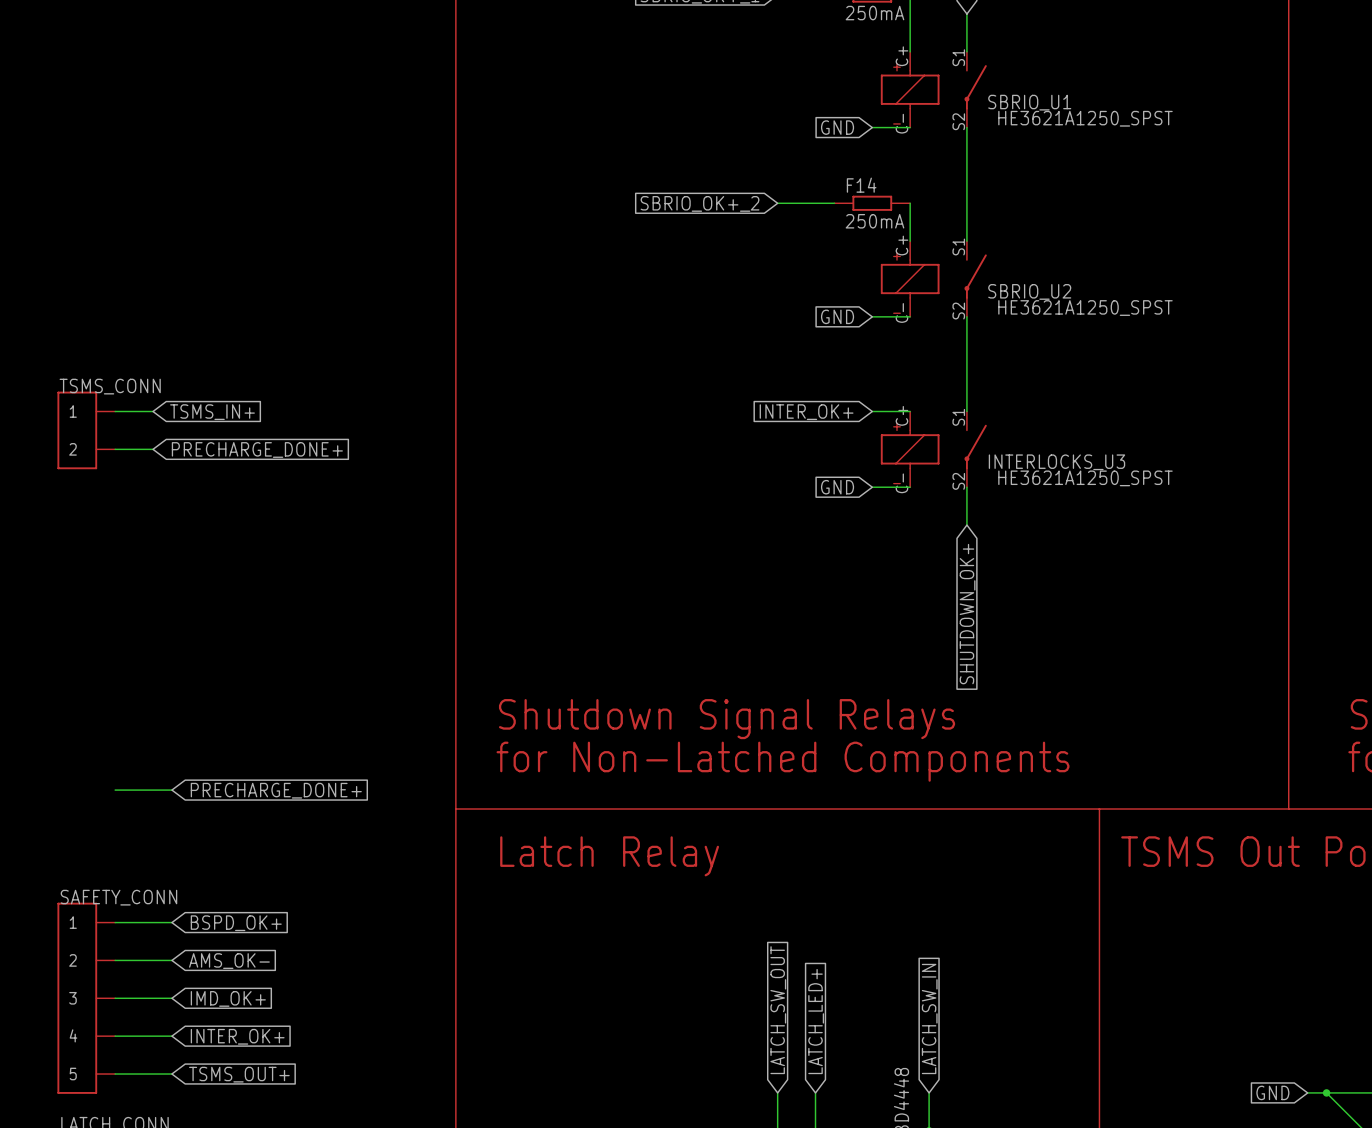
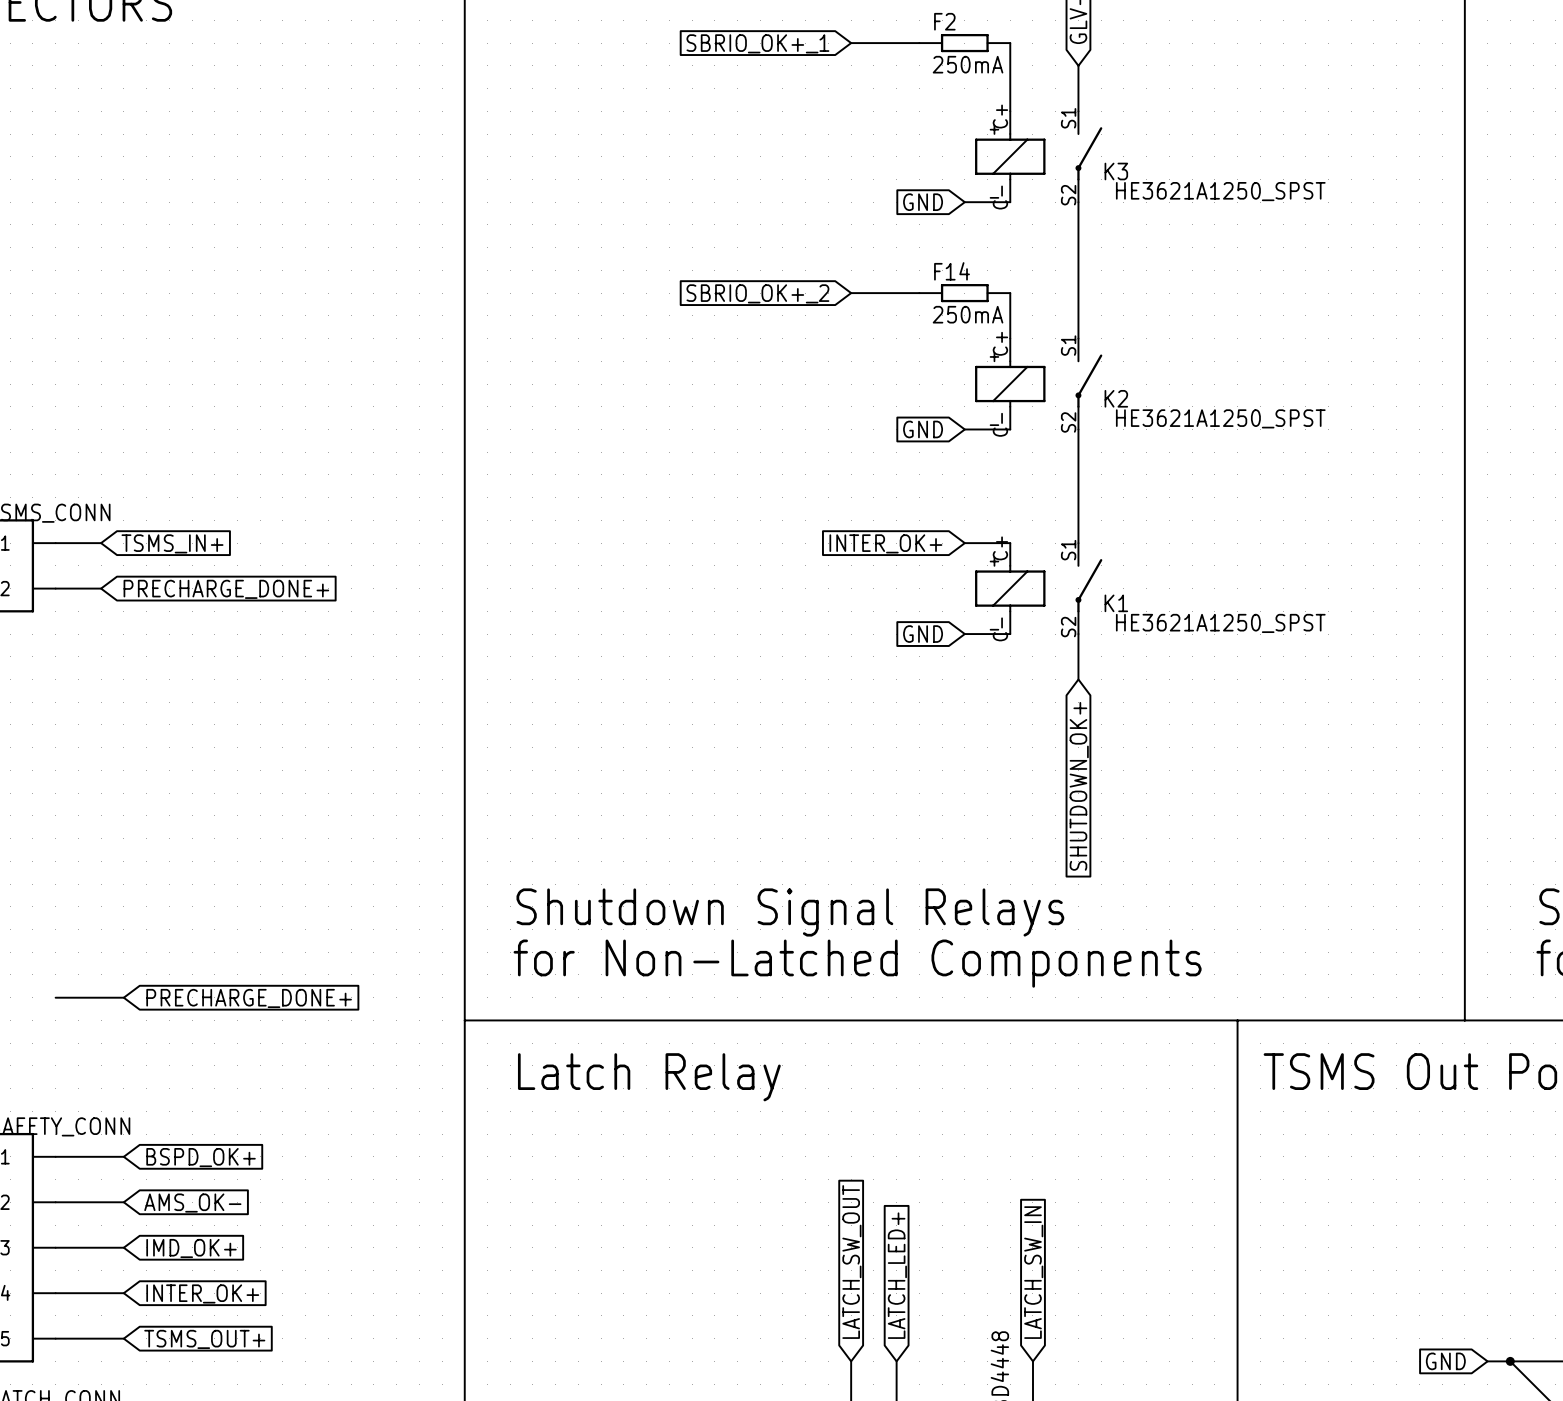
SBRIO_U1 name: SBRIO_U1 (1029, 102) -> K3 (1116, 171)
SBRIO_U2 name: SBRIO_U2 (1029, 291) -> K2 (1116, 398)
INTERLOCKS_U3 name: INTERLOCKS_U3 (1056, 462) -> K1 (1116, 603)

